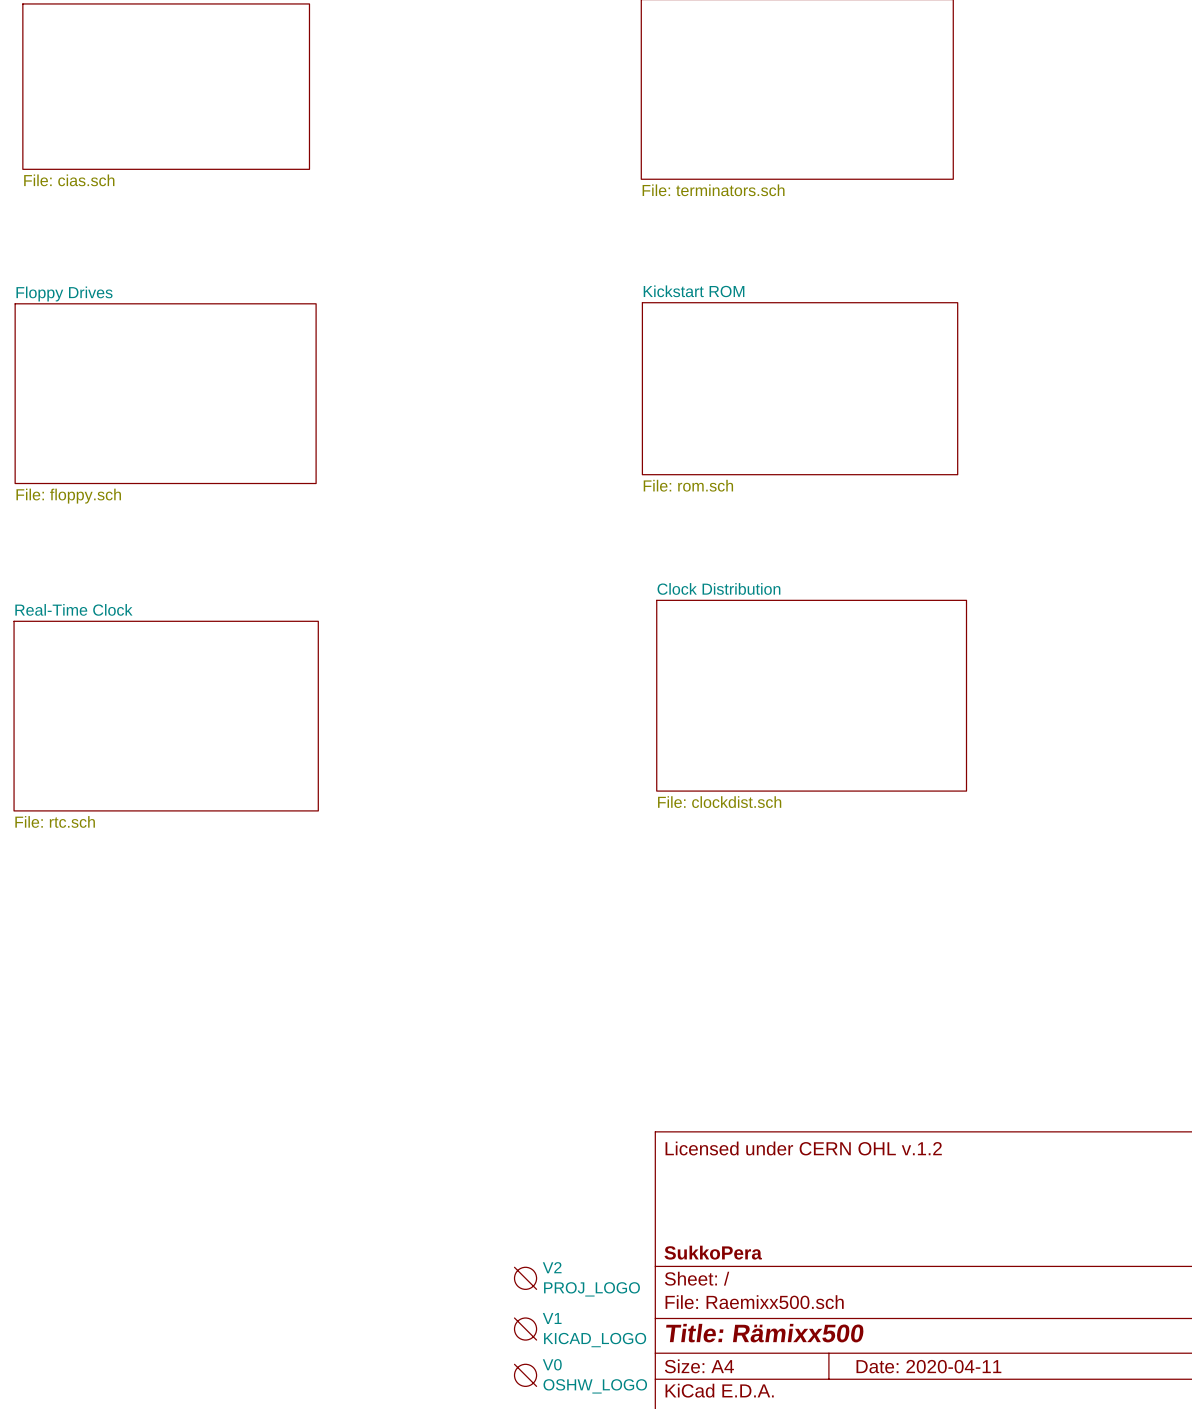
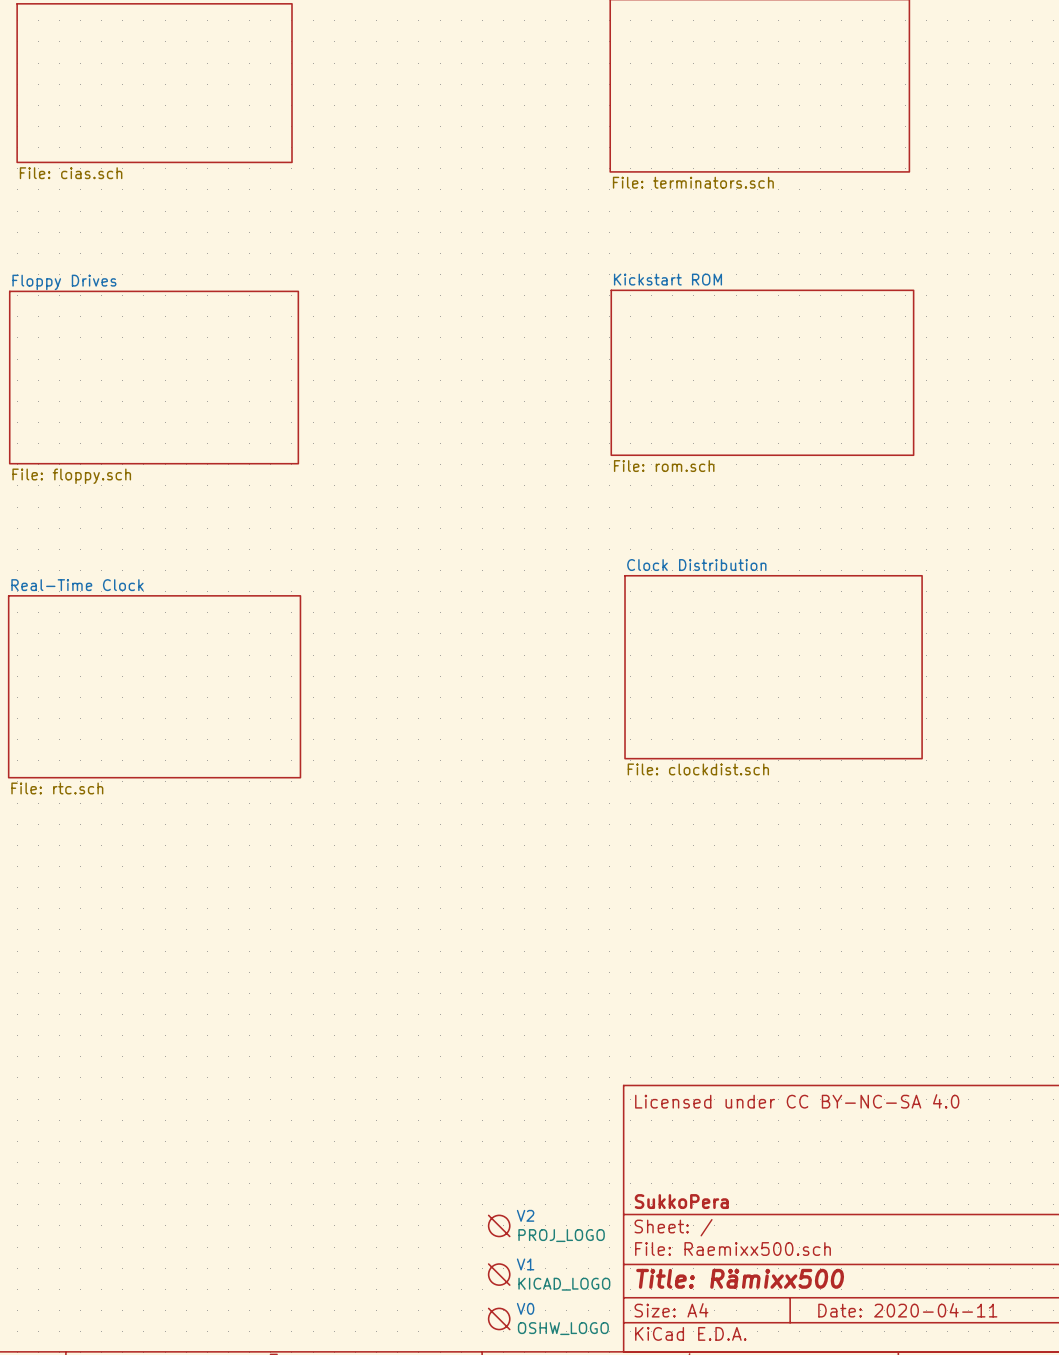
title block: Licensed under CERN OHL v.1.2 (803, 1148) -> Licensed under CC BY-NC-SA 4.0 (797, 1101)

